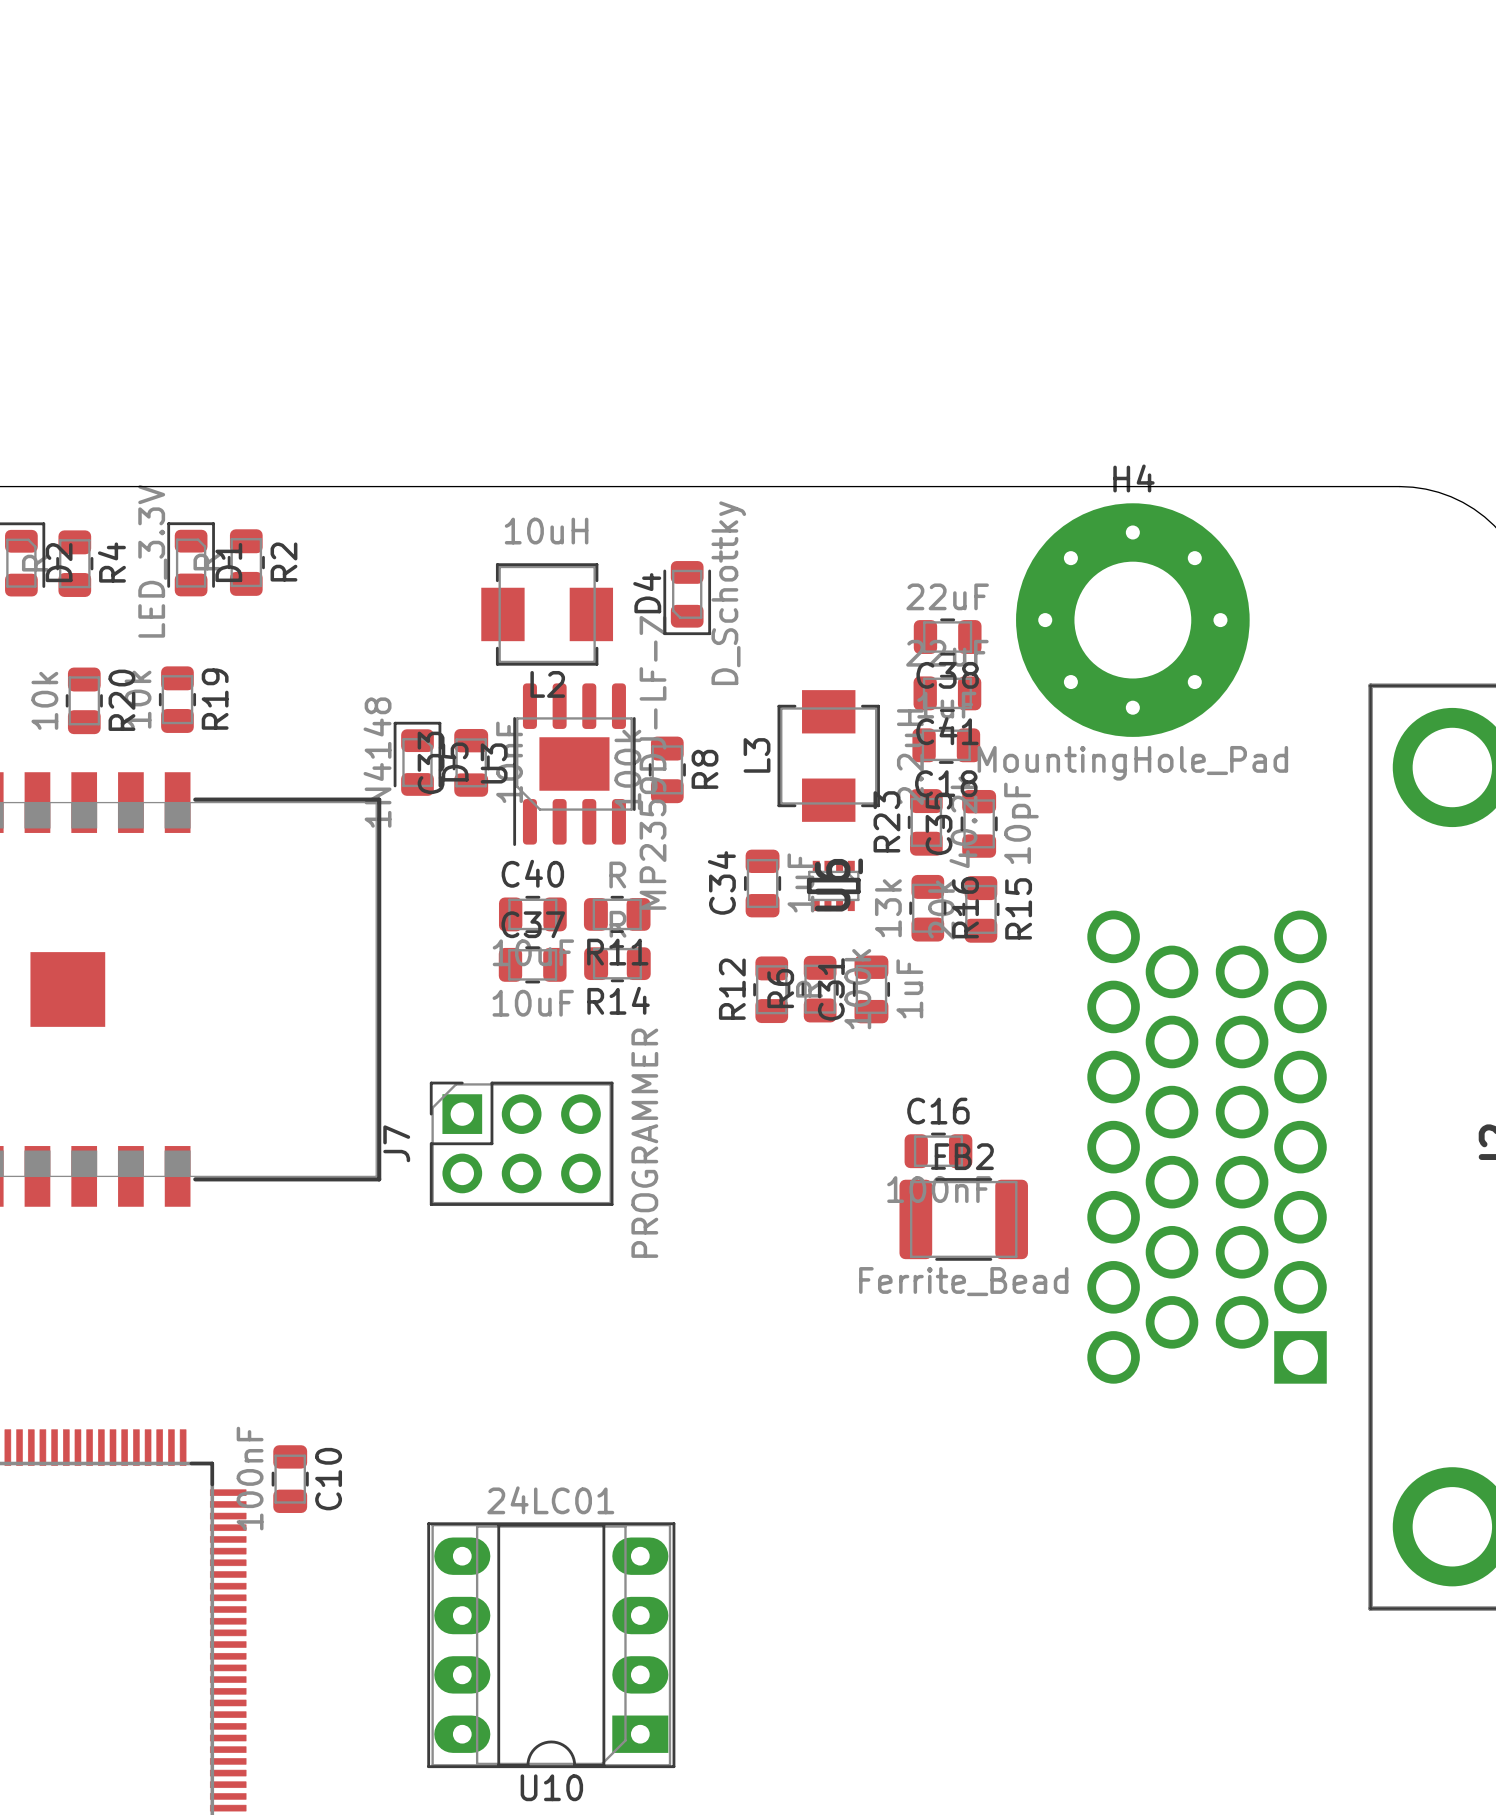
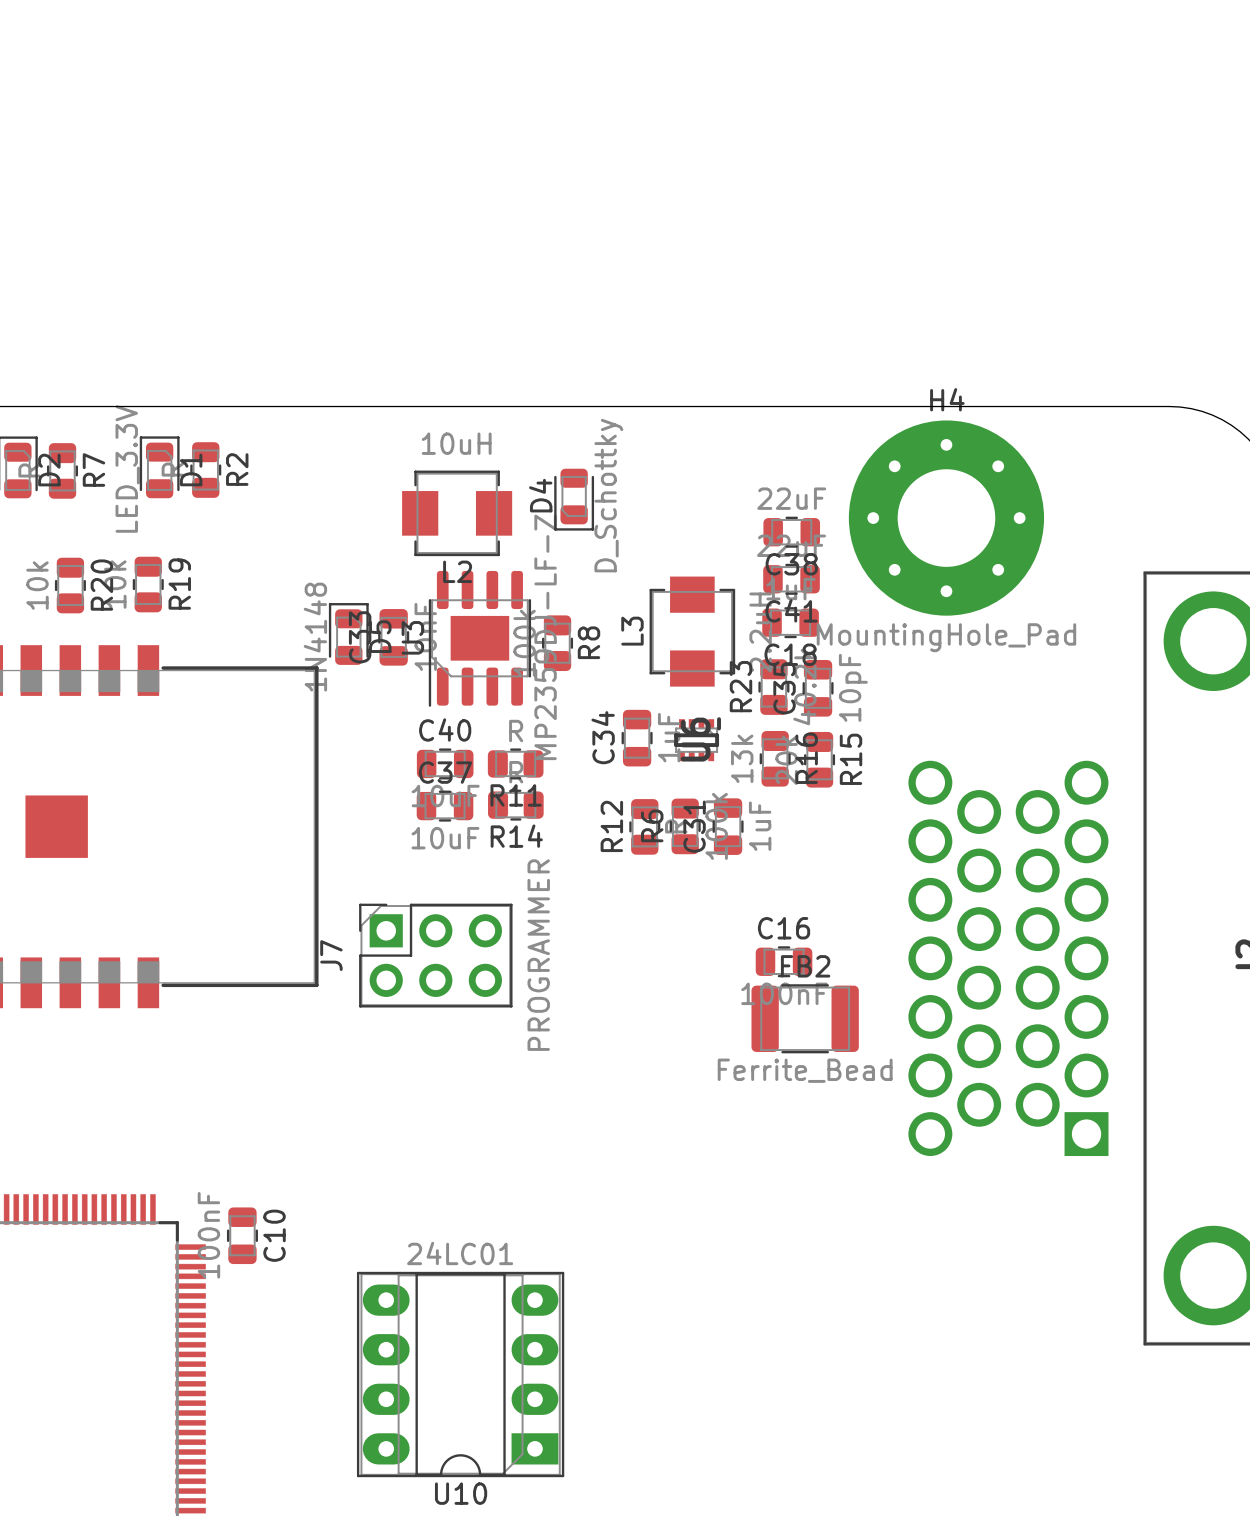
R4 name: R4 (111, 562) -> R7 (93, 470)

